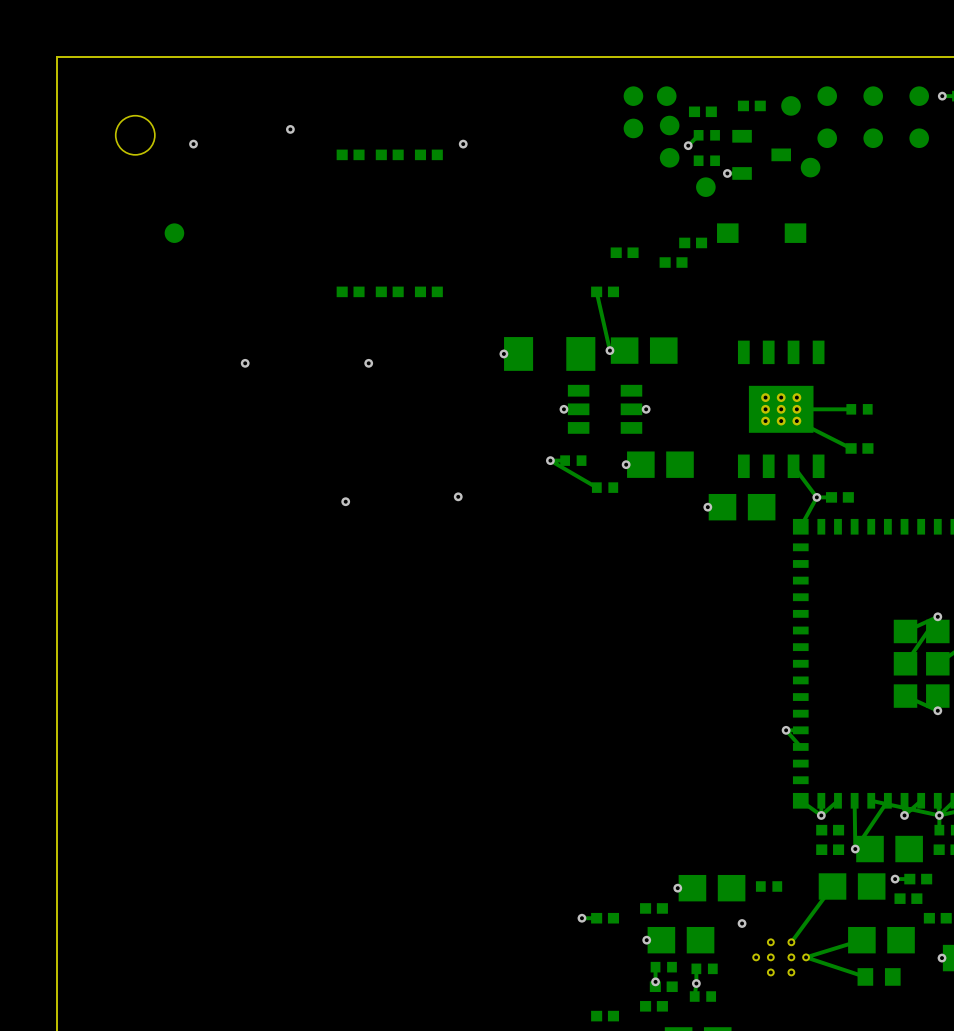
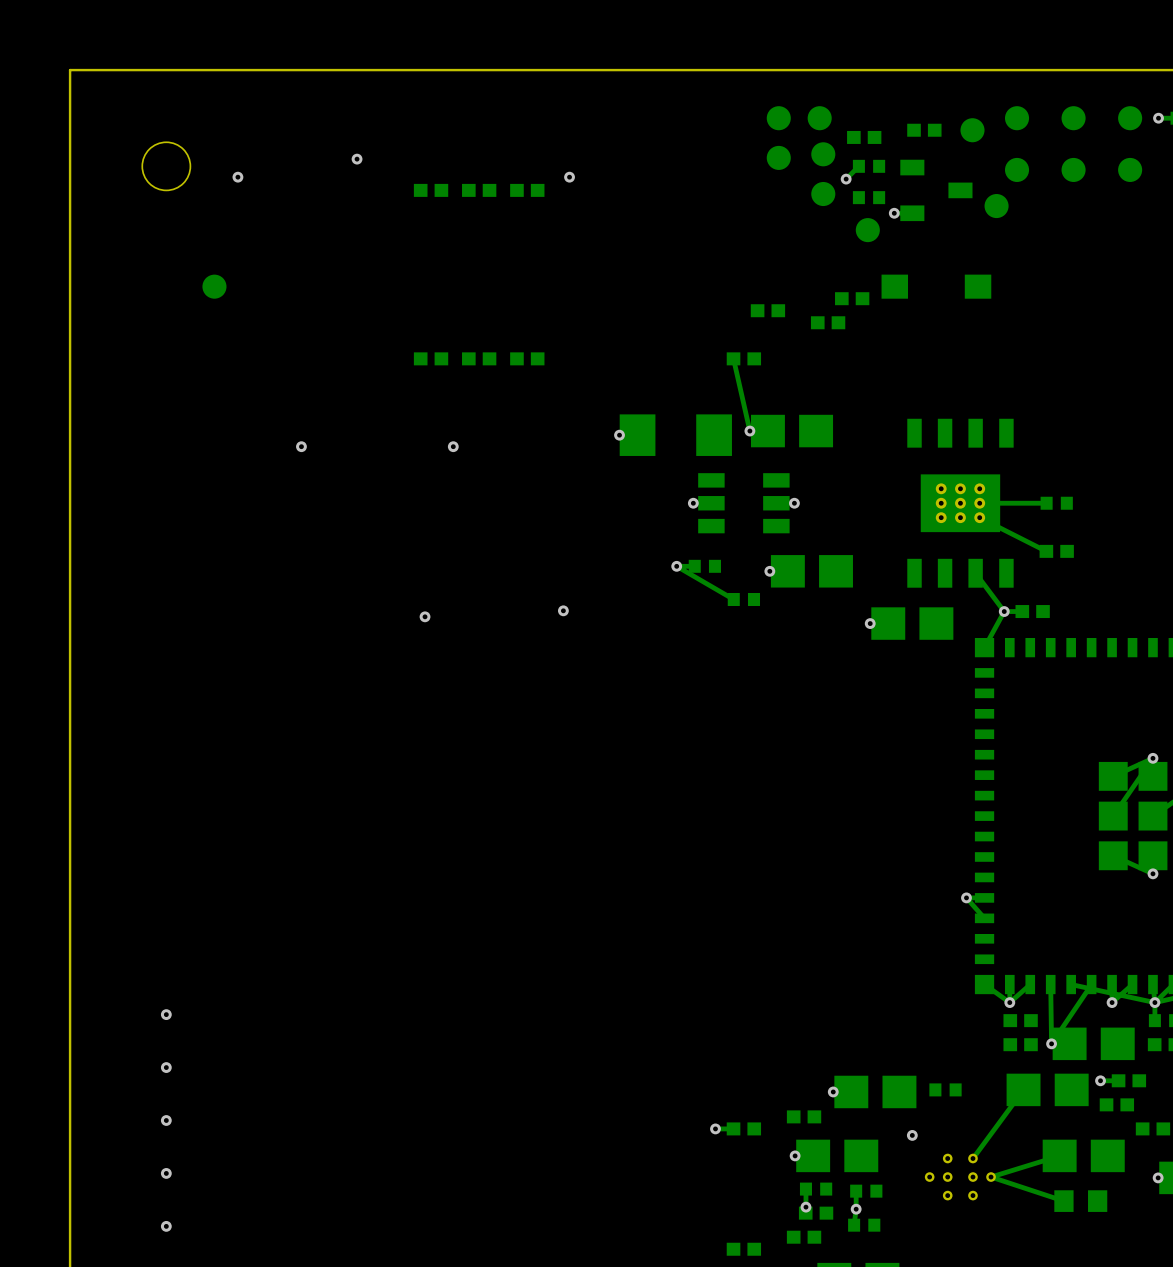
via: none -> (166, 1014)
via: none -> (166, 1067)
via: none -> (166, 1120)
via: none -> (166, 1173)
via: none -> (166, 1226)

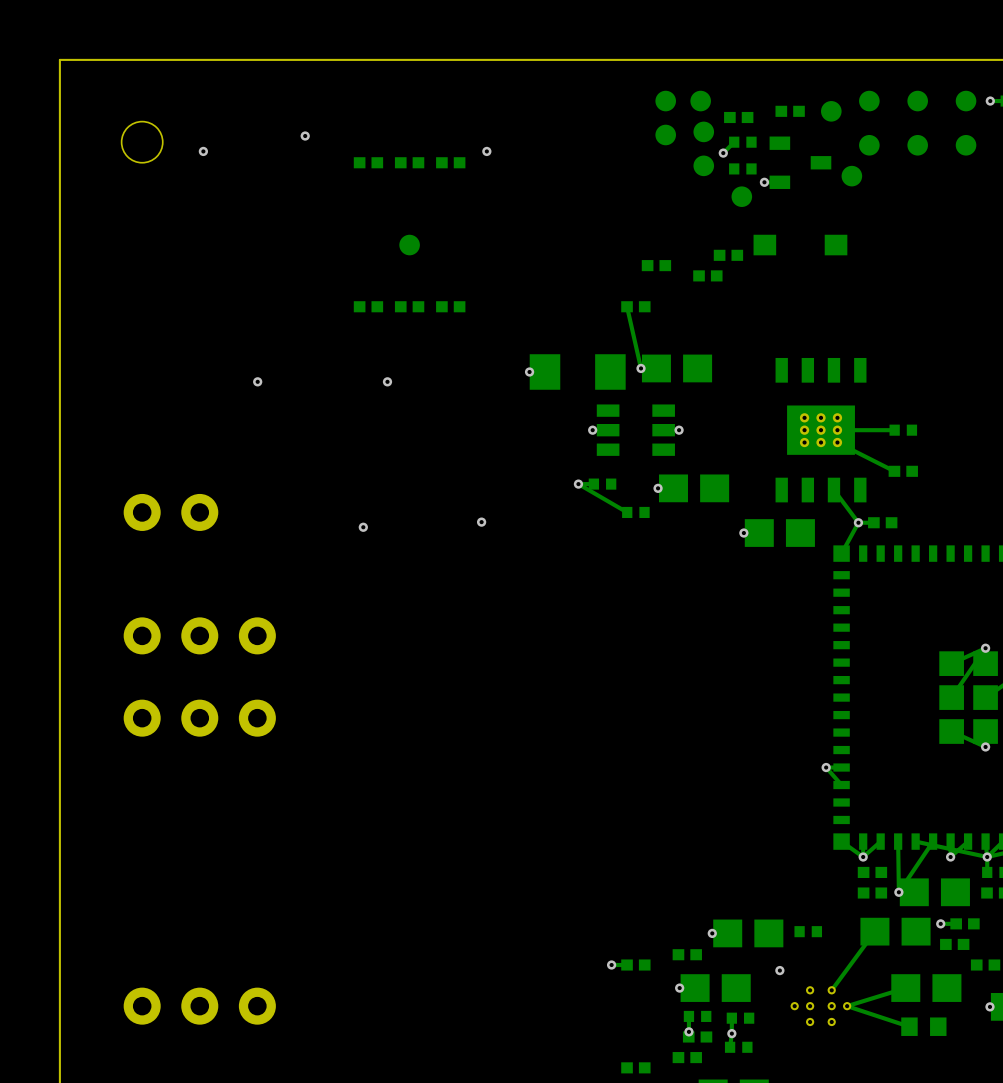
part position: (214, 286) -> (409, 245)
part: none -> (170, 512)
part: none -> (199, 635)
part: none -> (199, 718)
via: (166, 1014) -> none
via: (166, 1067) -> none
via: (166, 1120) -> none
via: (166, 1173) -> none
part: none -> (199, 1006)
via: (166, 1226) -> none

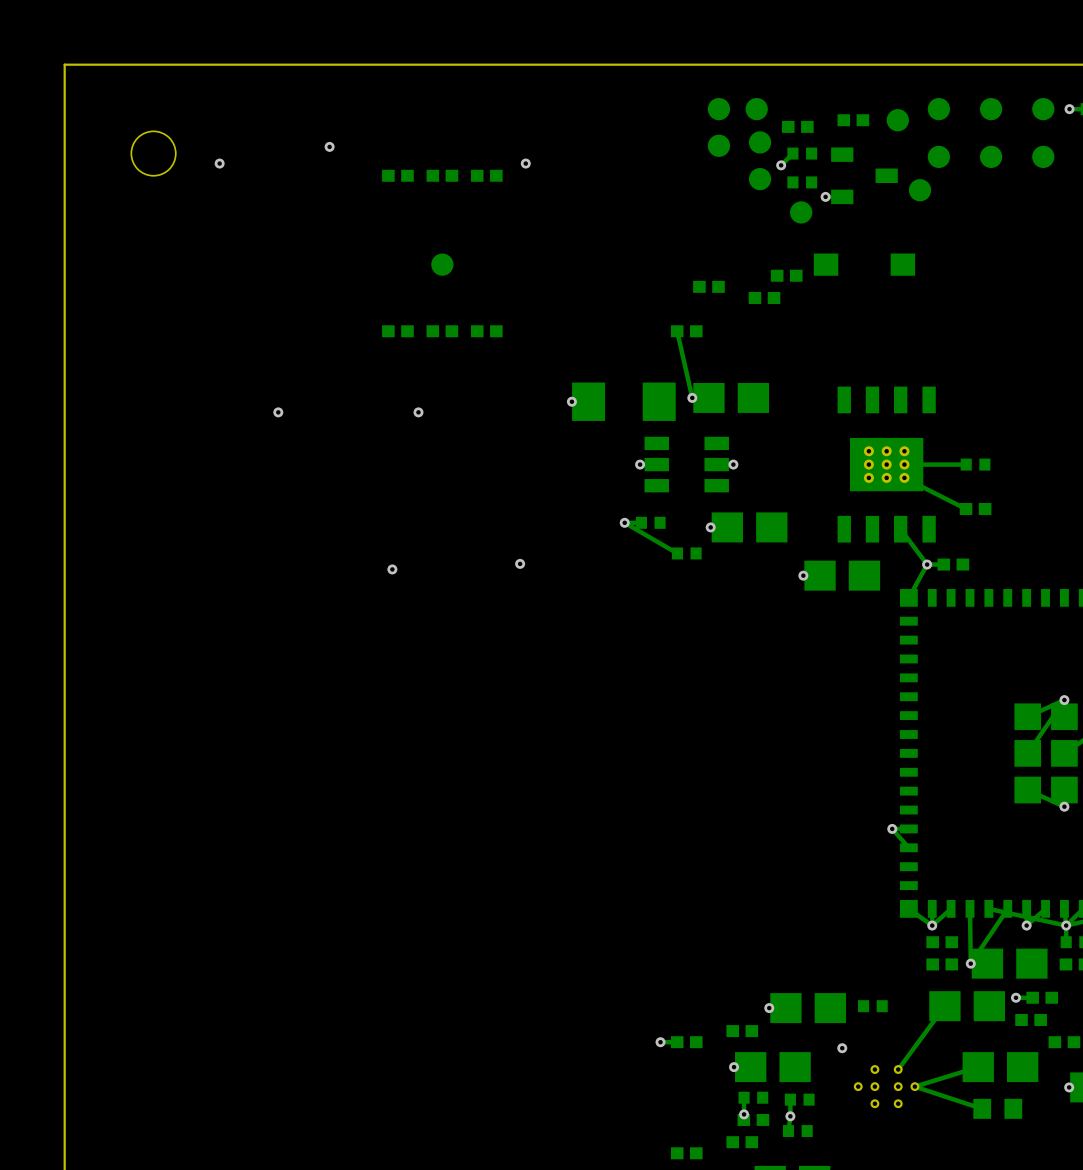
part: (170, 512) -> none
part: (199, 635) -> none
part: (199, 718) -> none
part: (199, 1006) -> none

